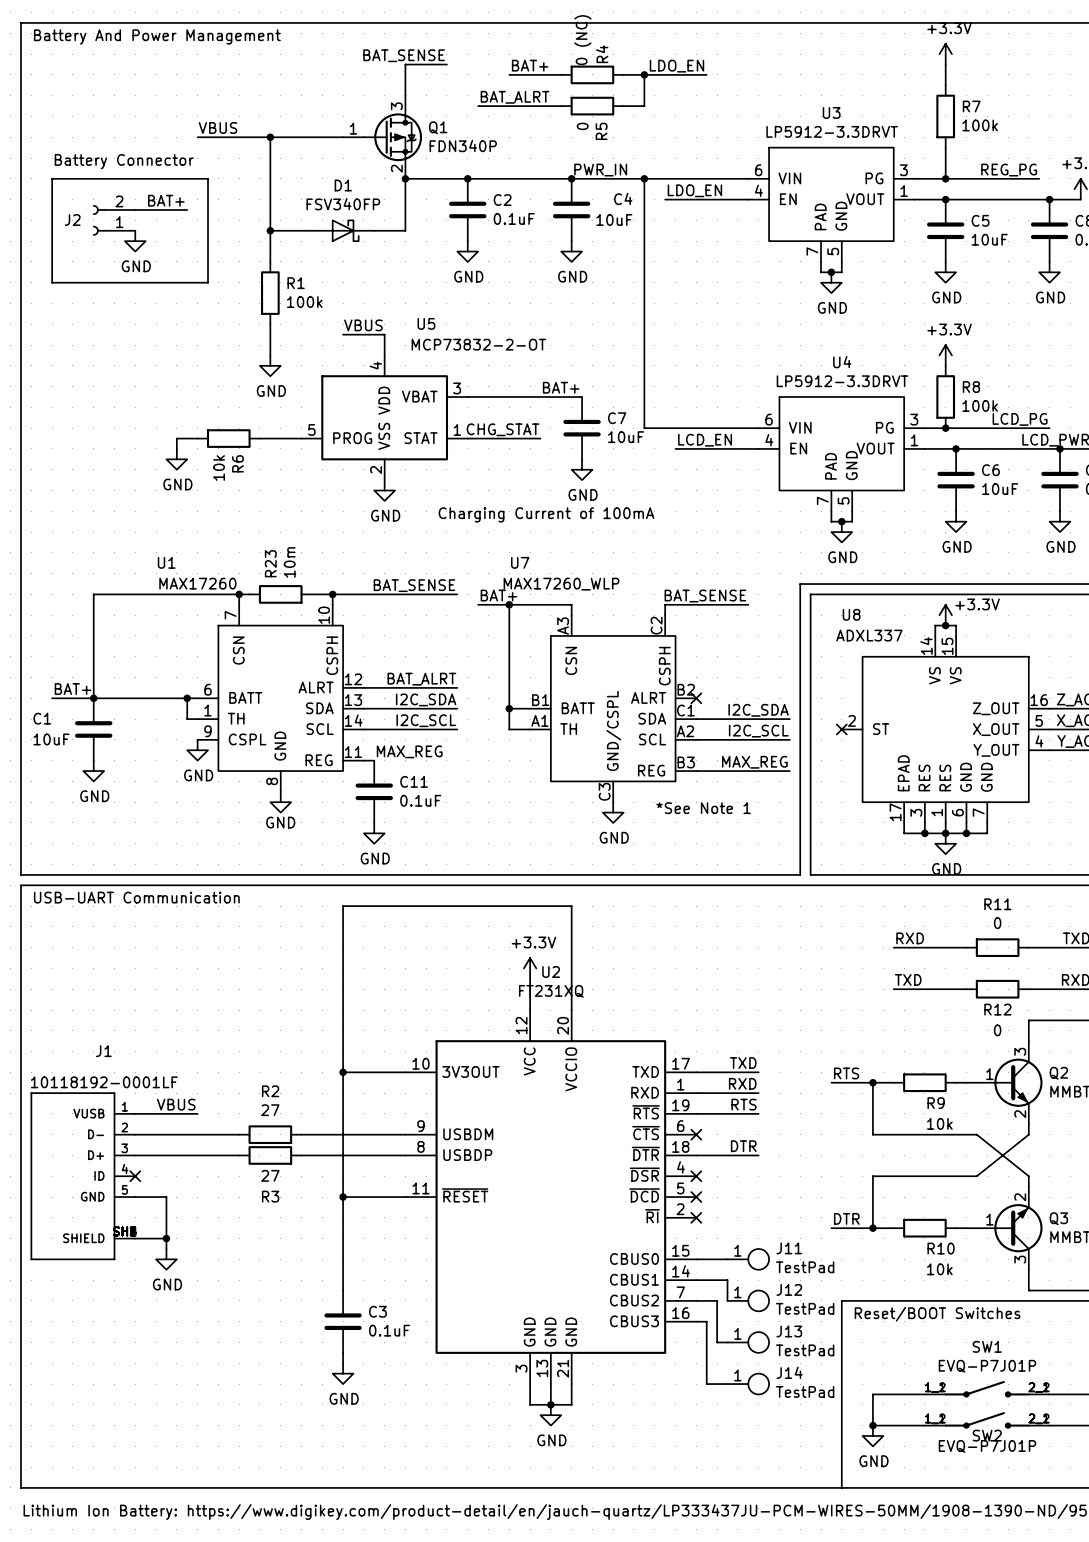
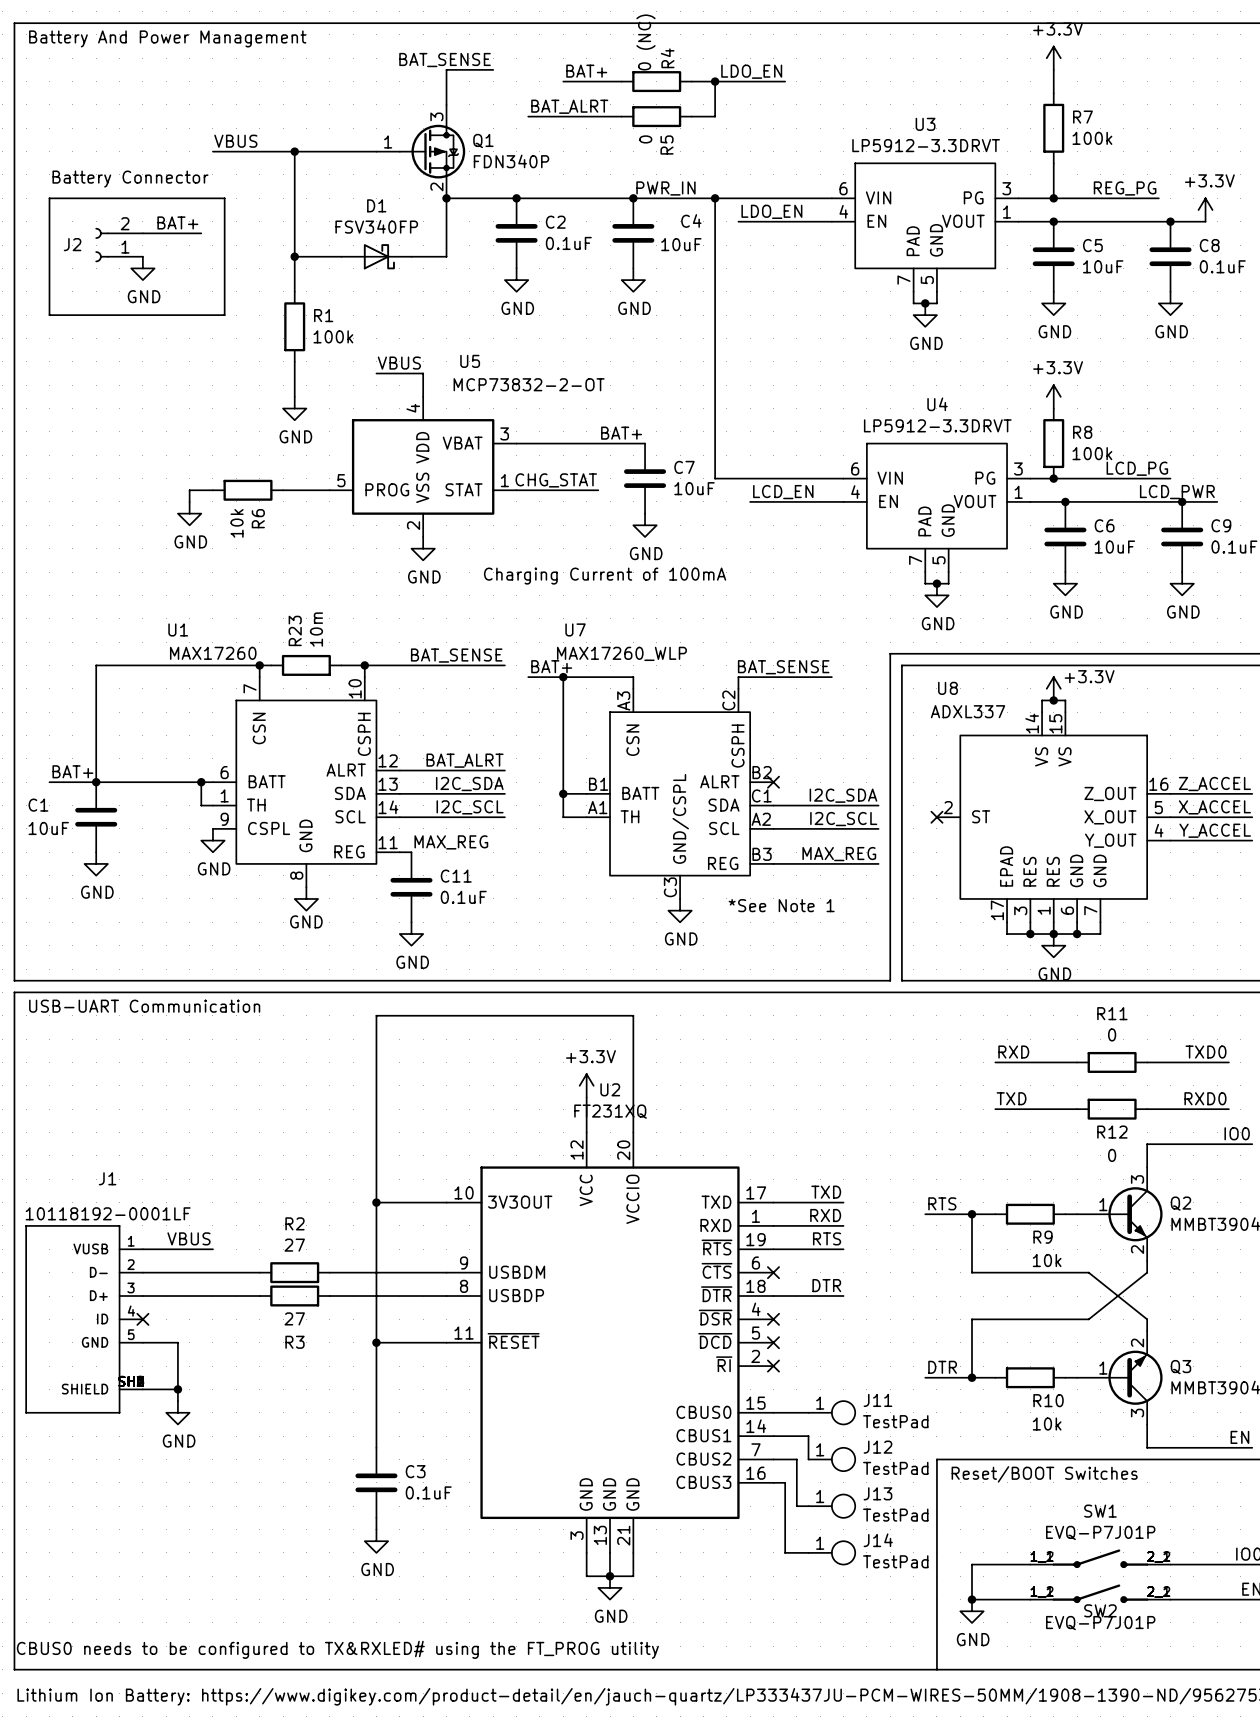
text: none -> CBUS0 needs to be configured to TX&RXLED# using the FT_PROG utility (337, 1649)

